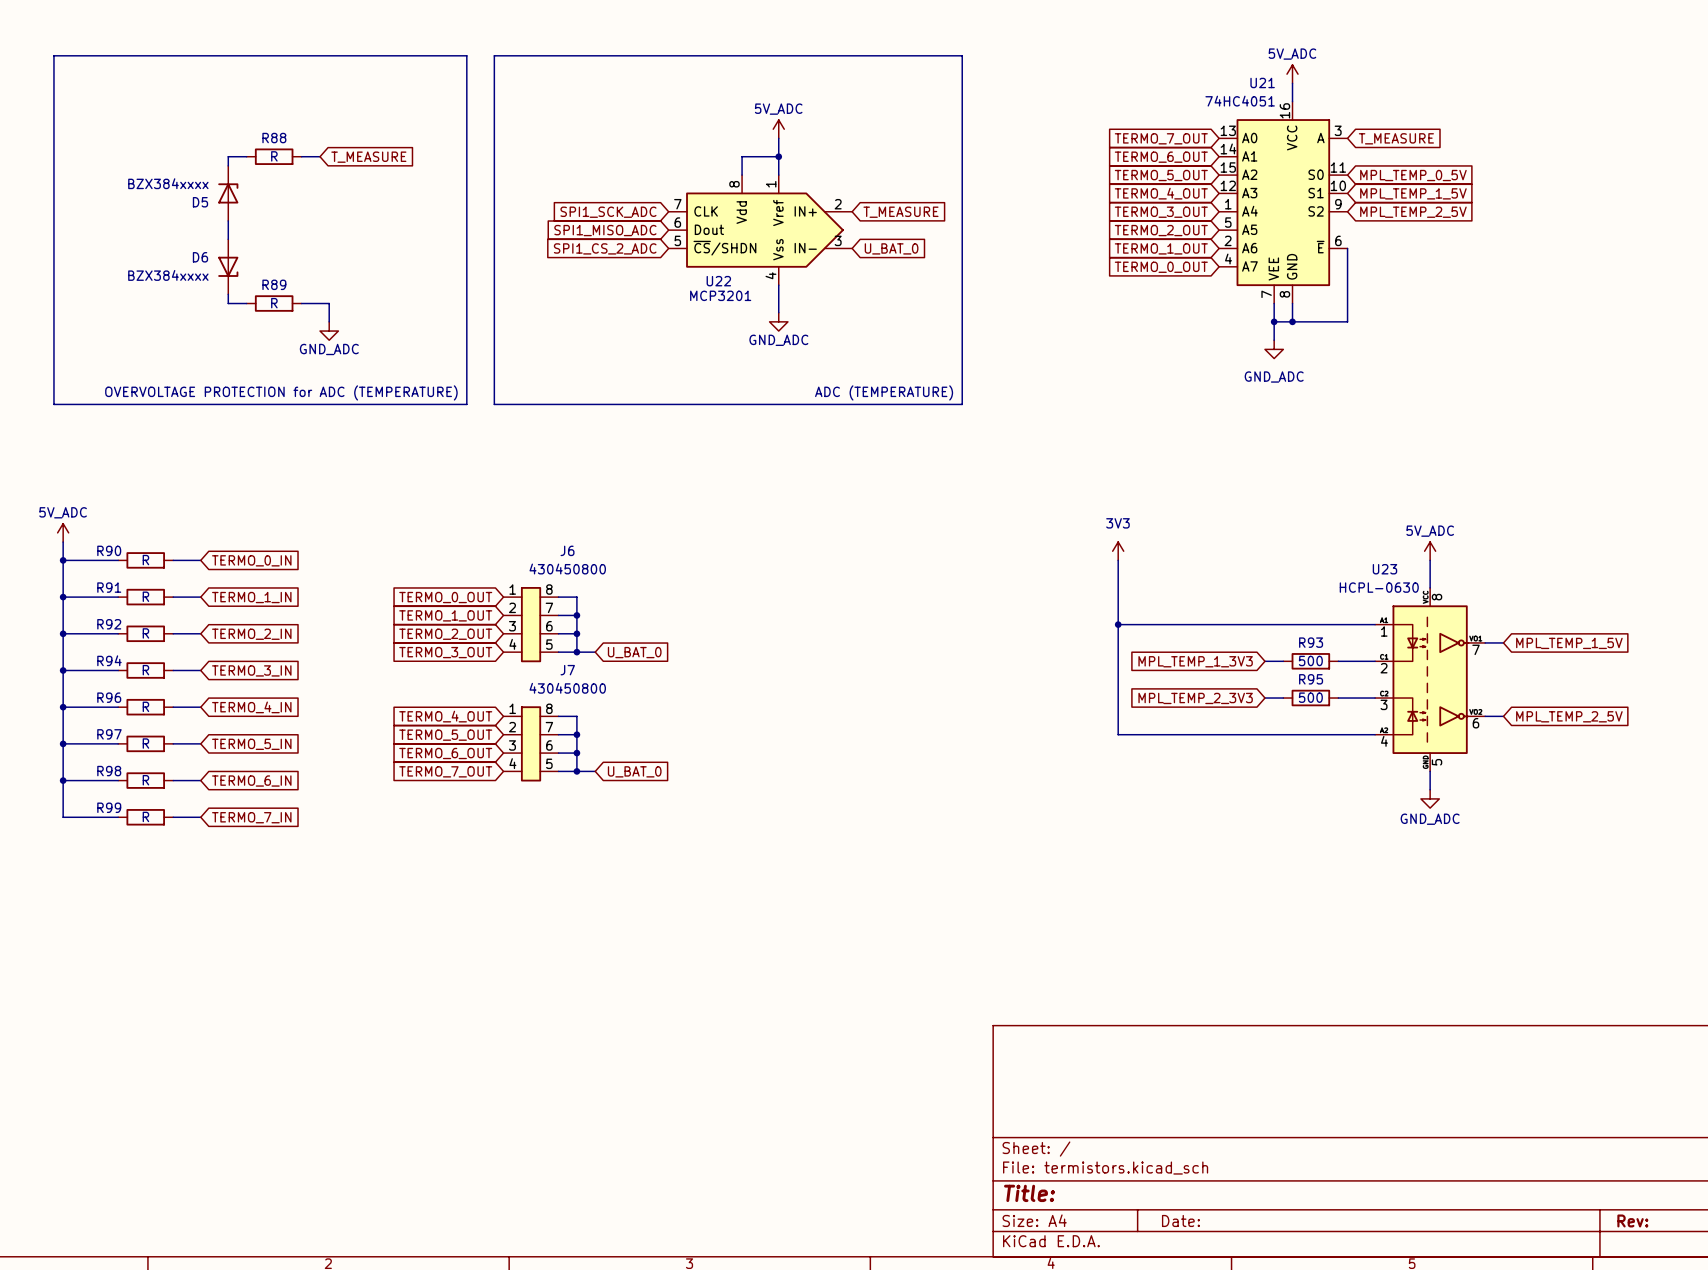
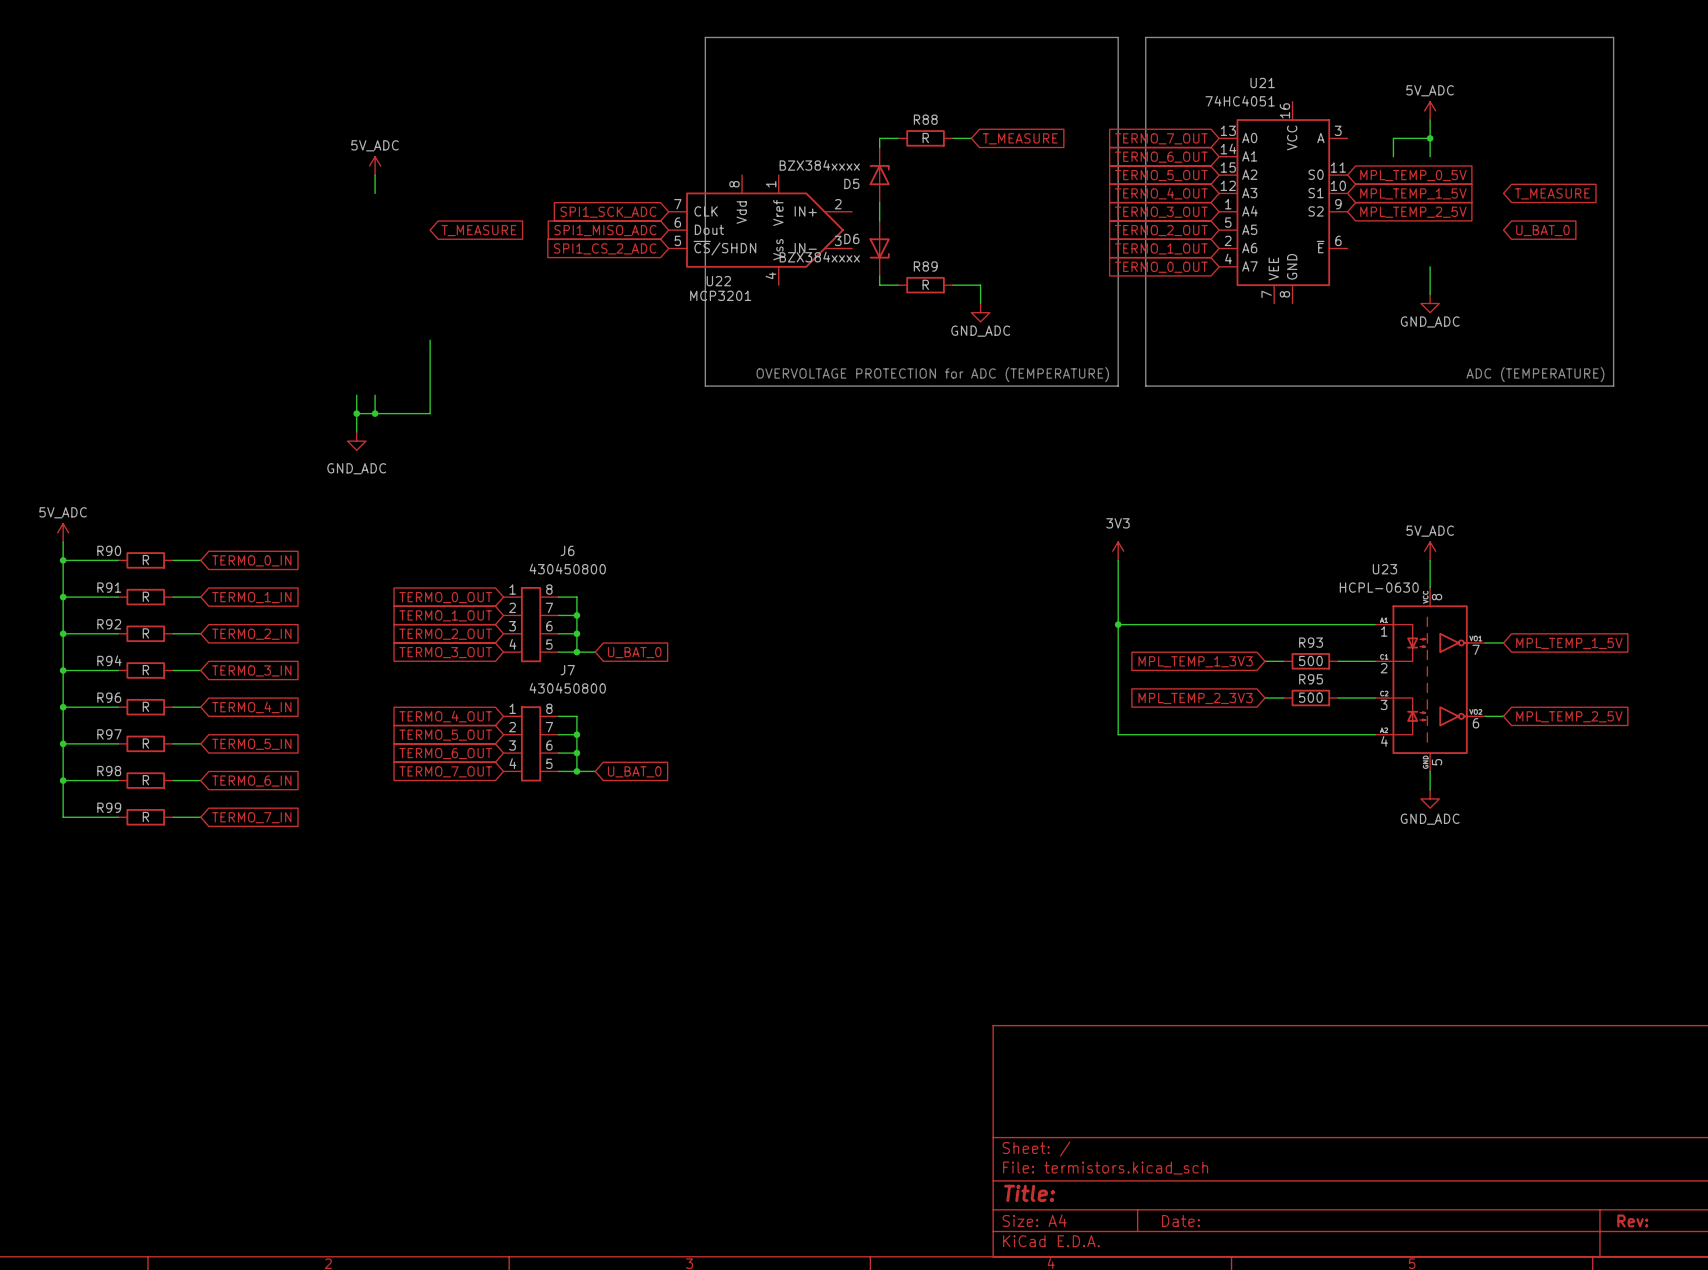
line: none -> (705, 37) (1118, 37) (1118, 386) (705, 386) (705, 37)
line: none -> (1145, 37) (1613, 37) (1613, 386) (1145, 386) (1145, 37)
line: (53, 55) (466, 55) (466, 404) (53, 404) (53, 55) -> none
line: (494, 55) (962, 55) (962, 404) (494, 404) (494, 55) -> none
power symbol position: 5V_ADC (1292, 74) -> 5V_ADC (1430, 110)
wire: (1292, 83) (1292, 101) -> none
wire: none -> (1430, 120) (1430, 156)
power symbol: 5V_ADC (778, 129) -> none
wire: (778, 138) (778, 175) -> none
wire: none -> (898, 138) (879, 138) (879, 147)
wire: none -> (953, 138) (971, 138)
global label position: T_MEASURE (1396, 138) -> T_MEASURE (1552, 193)
wire: none -> (1430, 138) (1393, 138) (1393, 156)
junction: none -> (1430, 138)
wire: (246, 156) (228, 156) (228, 165) -> none
R88 position: (274, 156) -> (925, 138)
wire: (301, 156) (320, 156) -> none
wire: (778, 156) (742, 156) (742, 175) -> none
junction: (778, 156) -> none
global label position: T_MEASURE (368, 157) -> T_MEASURE (478, 230)
power symbol: none -> 5V_ADC (375, 165)
D5 position: (228, 193) -> (879, 175)
global label position: T_MEASURE (900, 212) -> T_MEASURE (1020, 138)
wire: (228, 220) (228, 239) -> (375, 175) (375, 193)
global label: none -> U_BAT_0 (1542, 230)
global label: U_BAT_0 (891, 248) -> none
wire: (1347, 248) (1347, 321) (1274, 321) -> none
D6 position: (228, 266) -> (879, 248)
wire: none -> (1430, 266) (1430, 294)
wire: none -> (879, 275) (879, 285) (898, 285)
wire: (778, 285) (778, 312) -> none
wire: none -> (953, 285) (980, 285) (980, 303)
wire: (228, 294) (228, 303) (246, 303) -> none
R89 position: (274, 303) -> (925, 285)
wire: (301, 303) (329, 303) (329, 321) -> none
wire: (1274, 303) (1274, 340) -> none
wire: (1292, 303) (1292, 321) -> none
power symbol: none -> GND_ADC (1430, 303)
power symbol: none -> GND_ADC (980, 312)
power symbol: GND_ADC (778, 321) -> none
junction: (1274, 321) -> none
junction: (1292, 321) -> none
power symbol position: GND_ADC (329, 331) -> GND_ADC (356, 441)
wire: none -> (430, 340) (430, 413) (356, 413)
power symbol text position: GND_ADC (329, 349) -> GND_ADC (356, 468)
power symbol: GND_ADC (1274, 349) -> none
text: none -> OVERVOLTAGE PROTECTION for ADC (TEMPERATURE) (932, 374)
text: none -> ADC (TEMPERATURE) (1535, 374)
text: OVERVOLTAGE PROTECTION for ADC (TEMPERATURE) (281, 392) -> none
text: ADC (TEMPERATURE) (884, 392) -> none
wire: none -> (356, 395) (356, 431)
wire: none -> (375, 395) (375, 413)
junction: none -> (356, 413)
junction: none -> (375, 413)

